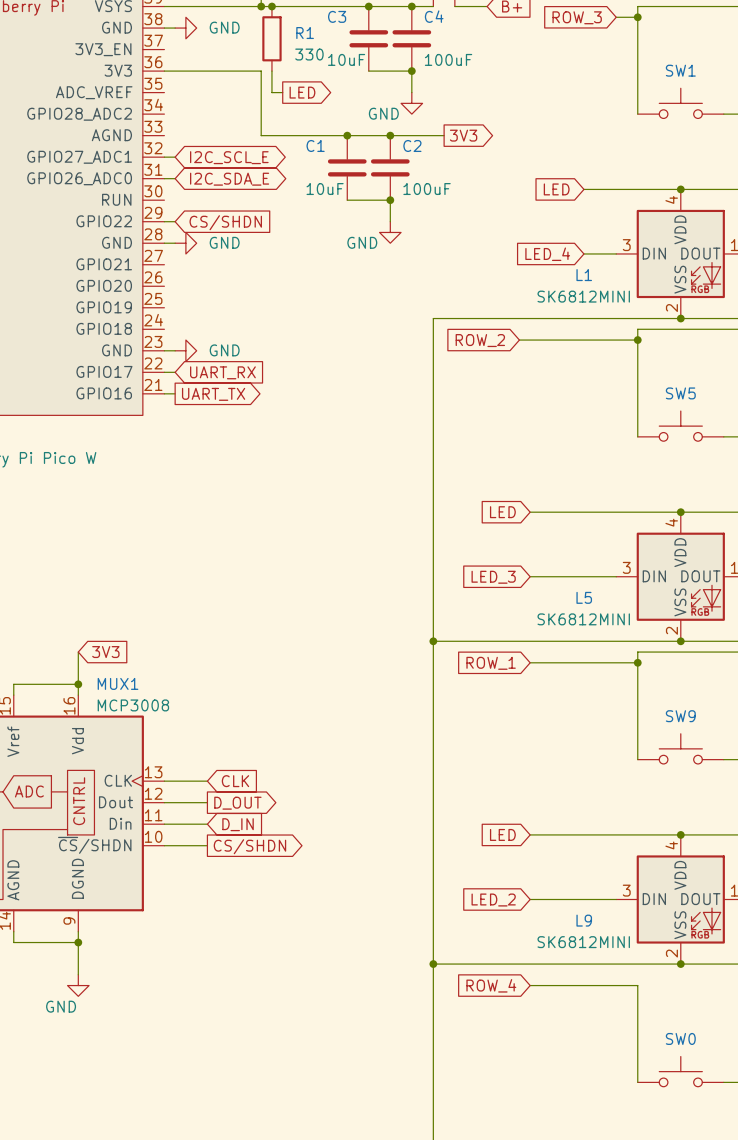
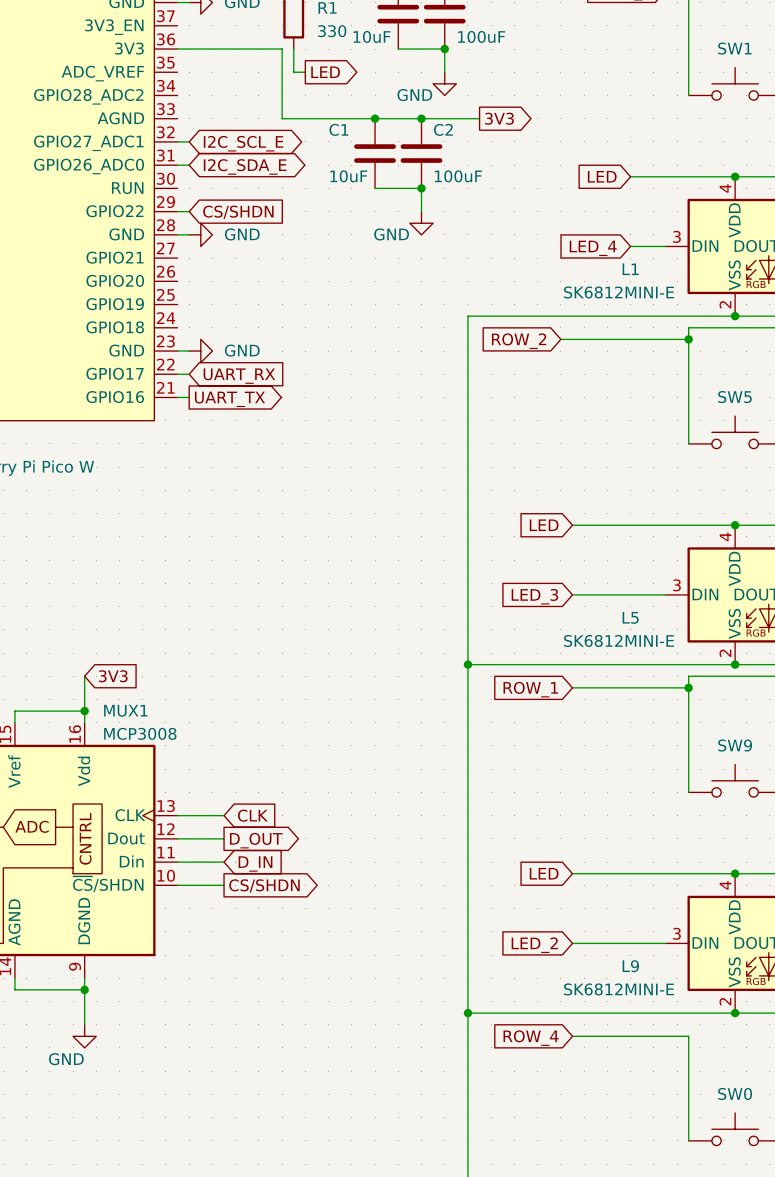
L1 value: SK6812MINI (583, 296) -> SK6812MINI-E (618, 292)
L5 value: SK6812MINI (583, 619) -> SK6812MINI-E (618, 640)
L9 value: SK6812MINI (583, 942) -> SK6812MINI-E (618, 989)

